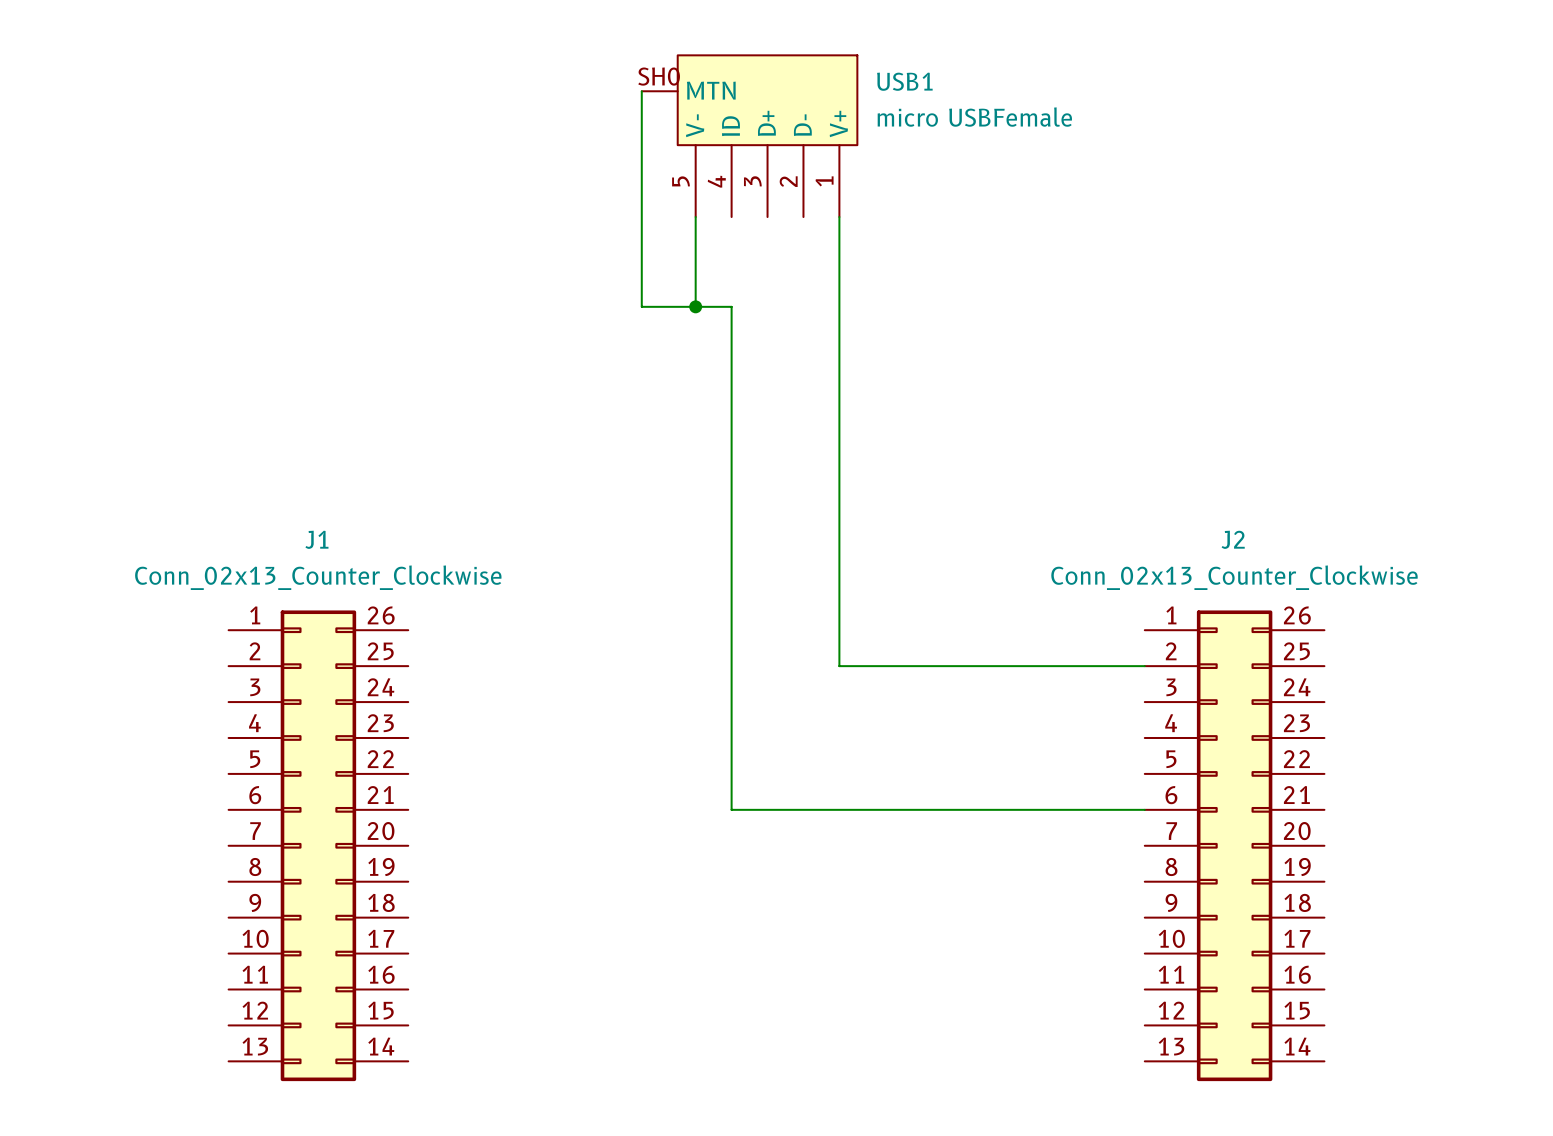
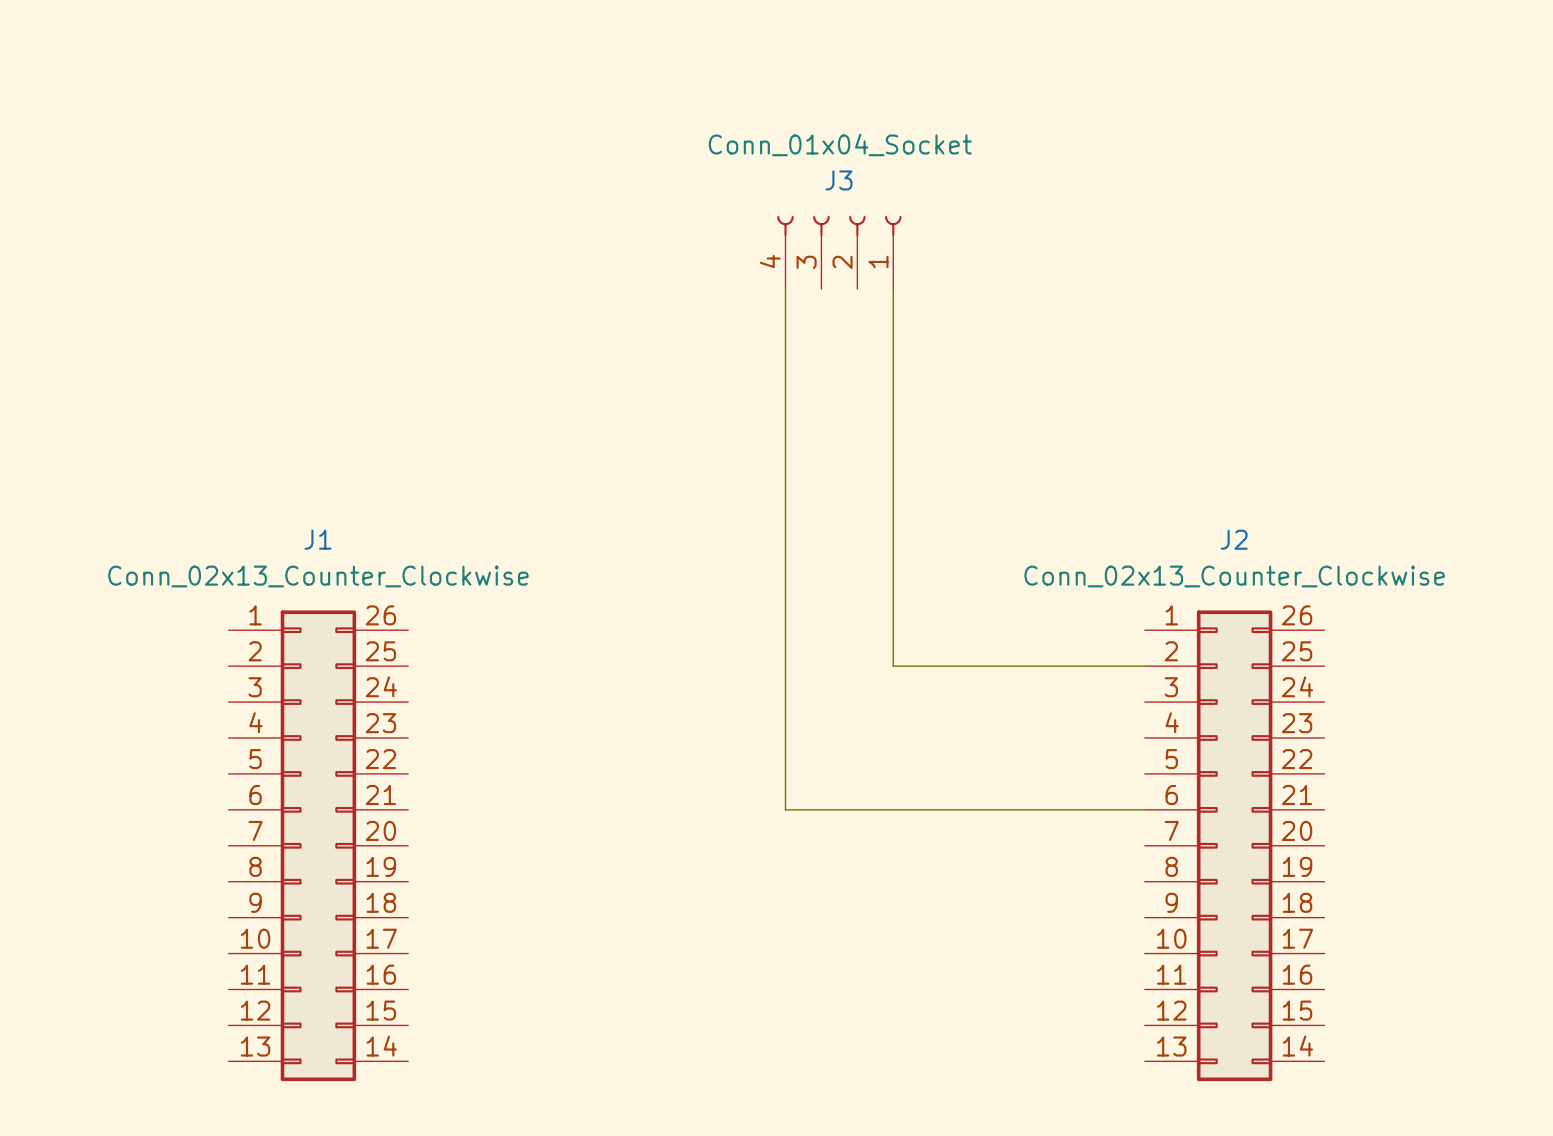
wire: (641, 91) (641, 306) (731, 306) (731, 809) (785, 809) -> (785, 288) (785, 809)
USB1: micro USBFemale (749, 136) -> none
wire: (695, 217) (695, 306) -> none
wire: (839, 217) (839, 666) (893, 666) -> (893, 288) (893, 666)
J3: none -> Conn_01x04_Socket (839, 252)
junction: (695, 306) -> none

